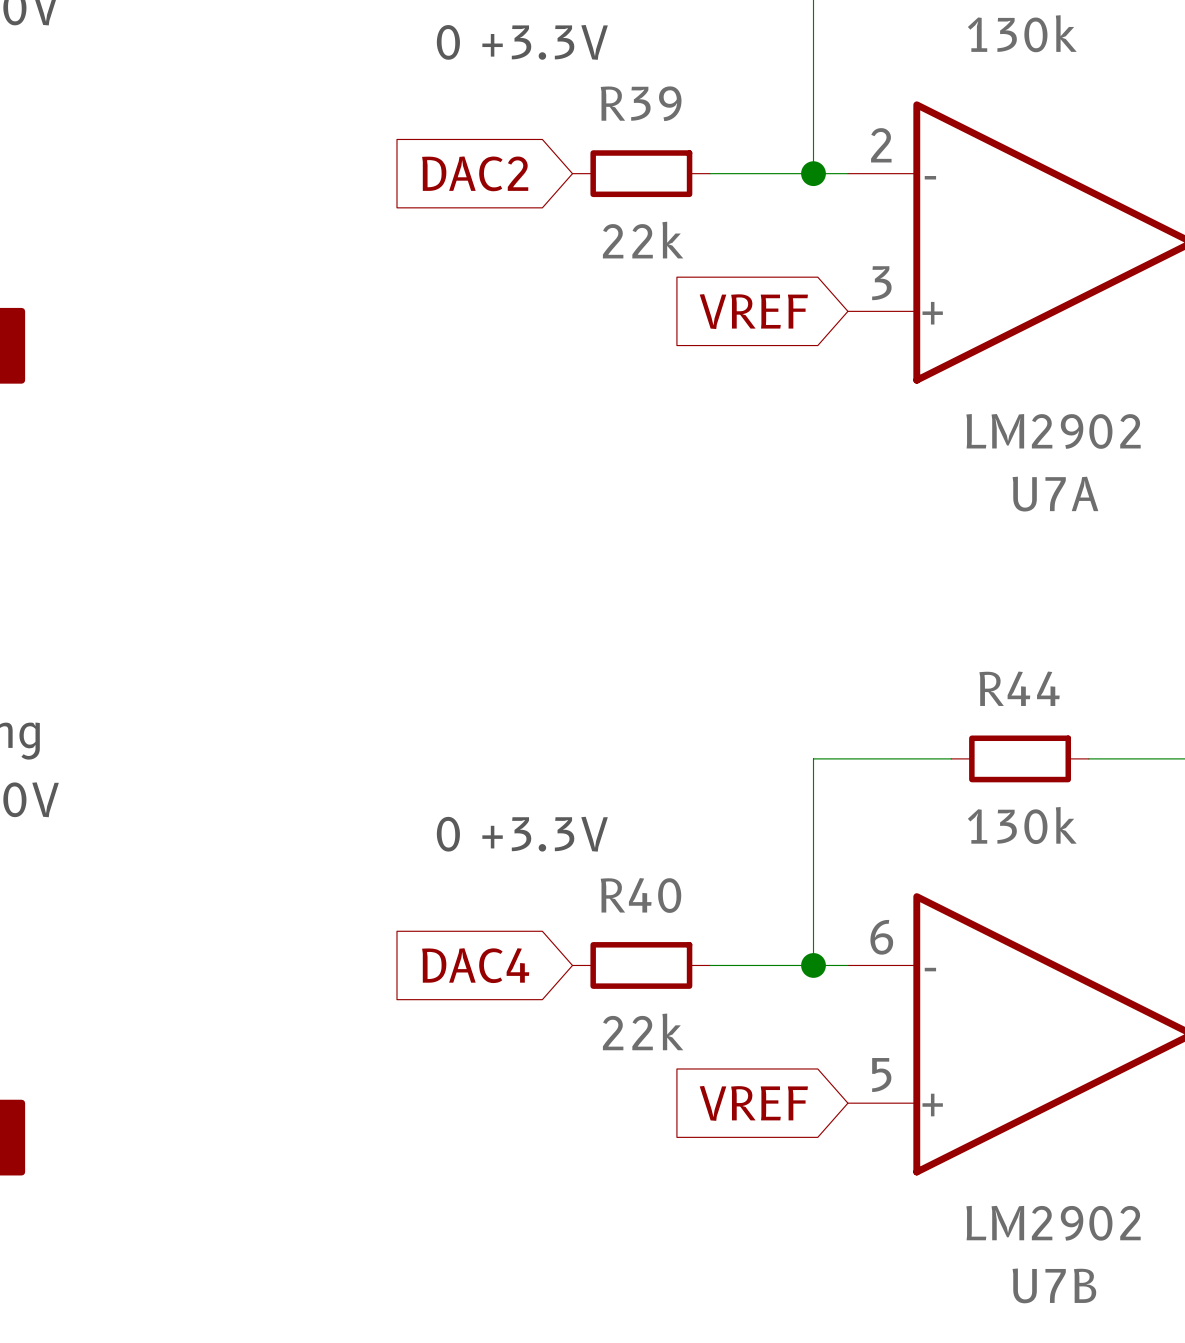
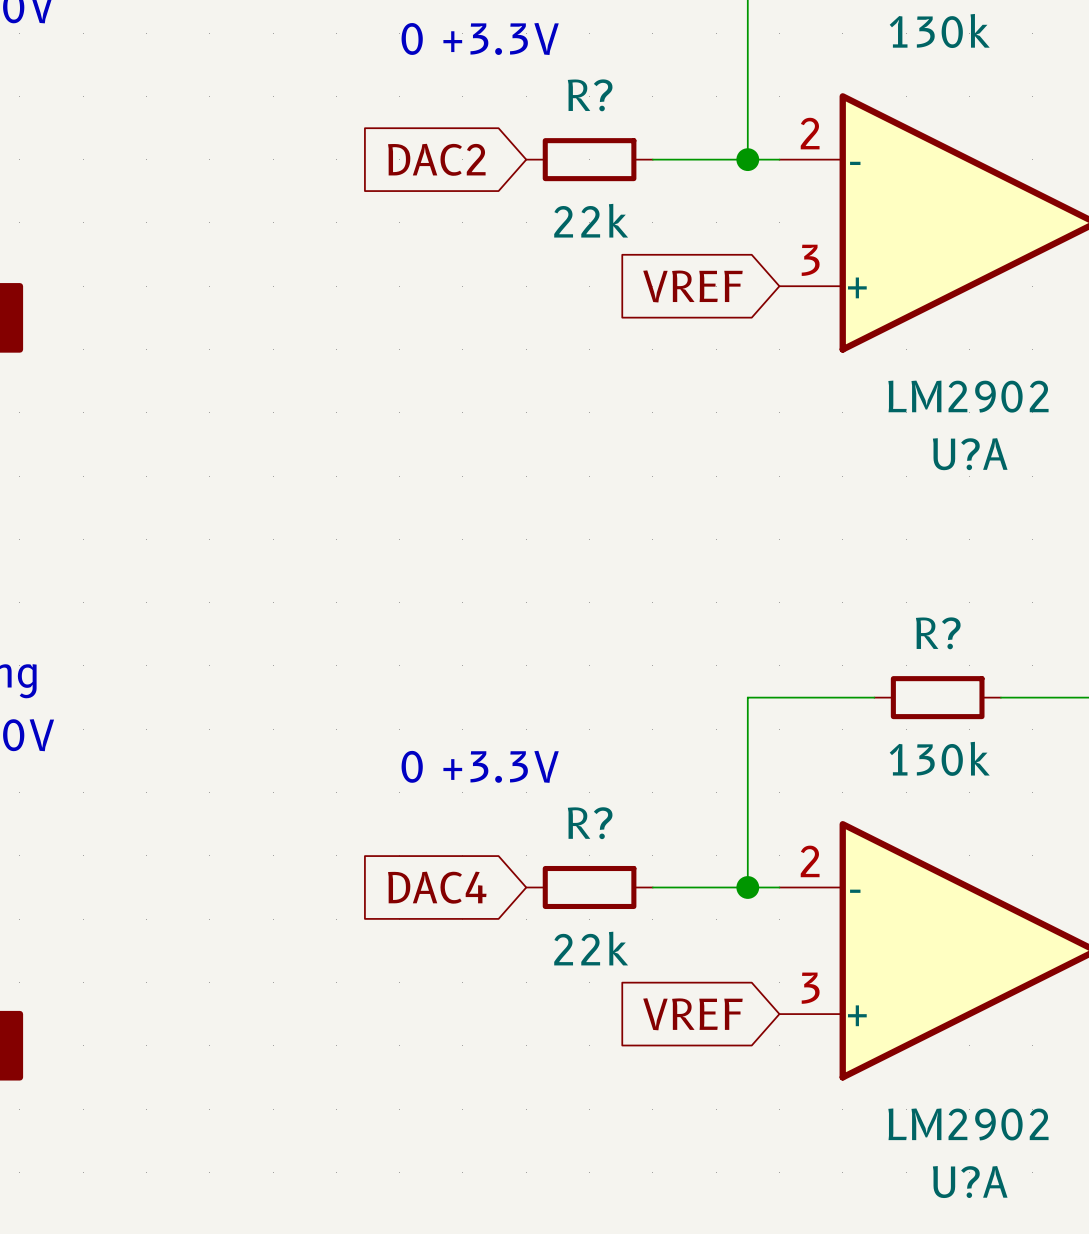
R39 name: R39 (641, 103) -> R? (590, 95)
U7A name: U7A (1055, 494) -> U?A (970, 454)
R44 name: R44 (1019, 688) -> R? (938, 633)
R40 name: R40 (640, 895) -> R? (590, 823)
U7B pin number: 6 (881, 937) -> 2 (810, 861)
U7B pin number: 5 (881, 1075) -> 3 (810, 988)
U7B name: U7B (1054, 1285) -> U?A (970, 1182)

